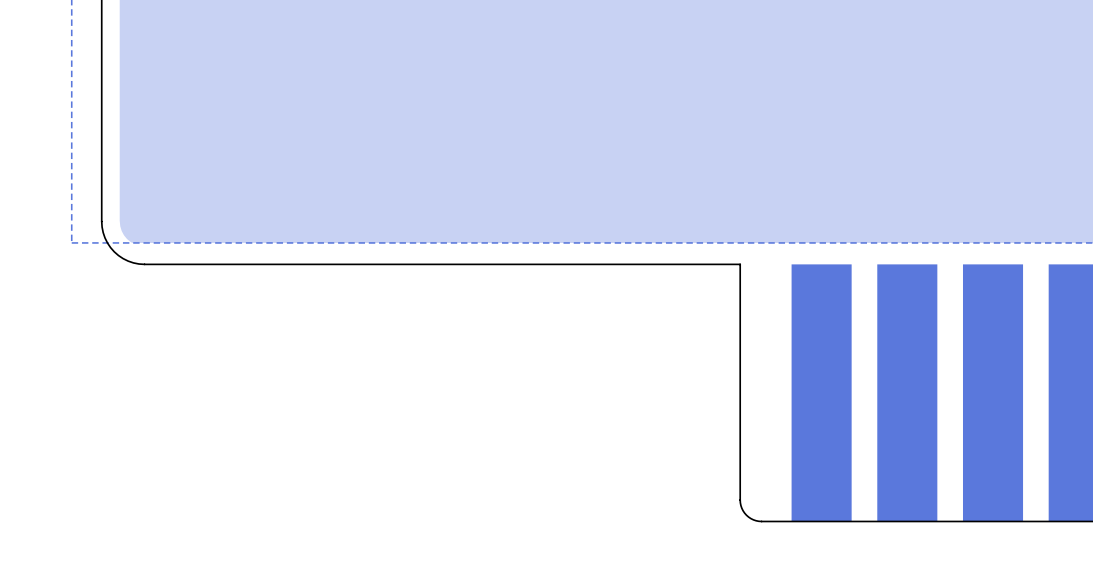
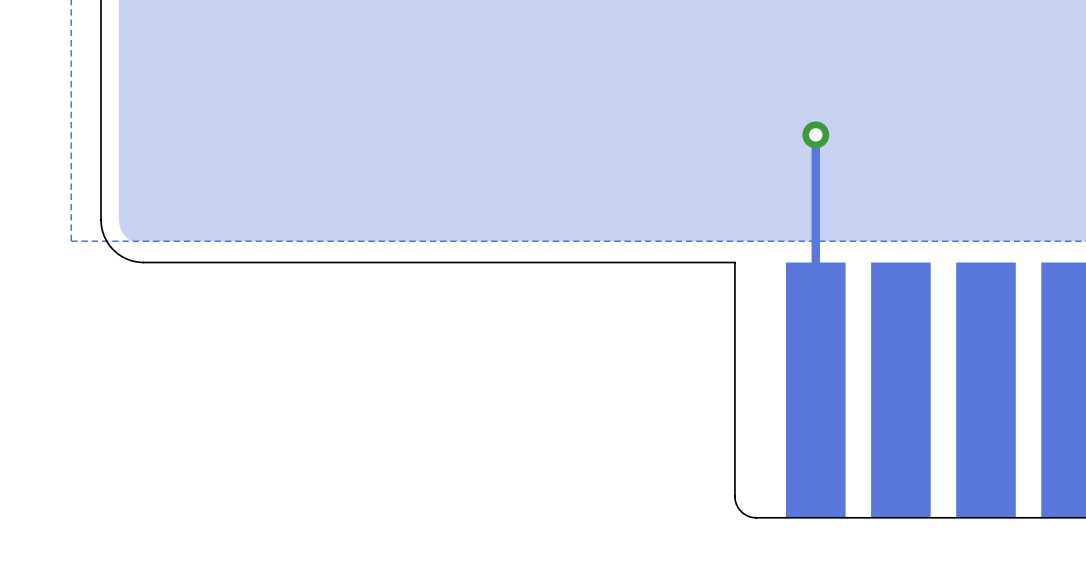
track: none -> (815, 134) (815, 390)
via: none -> (815, 134)

